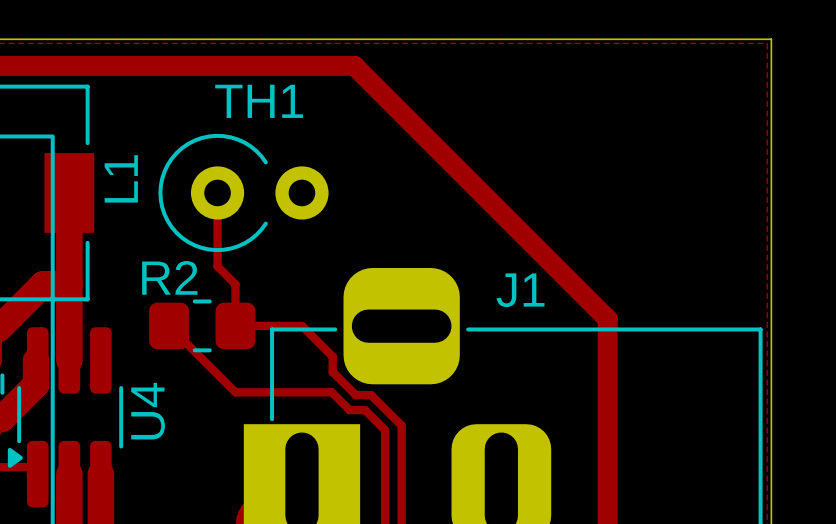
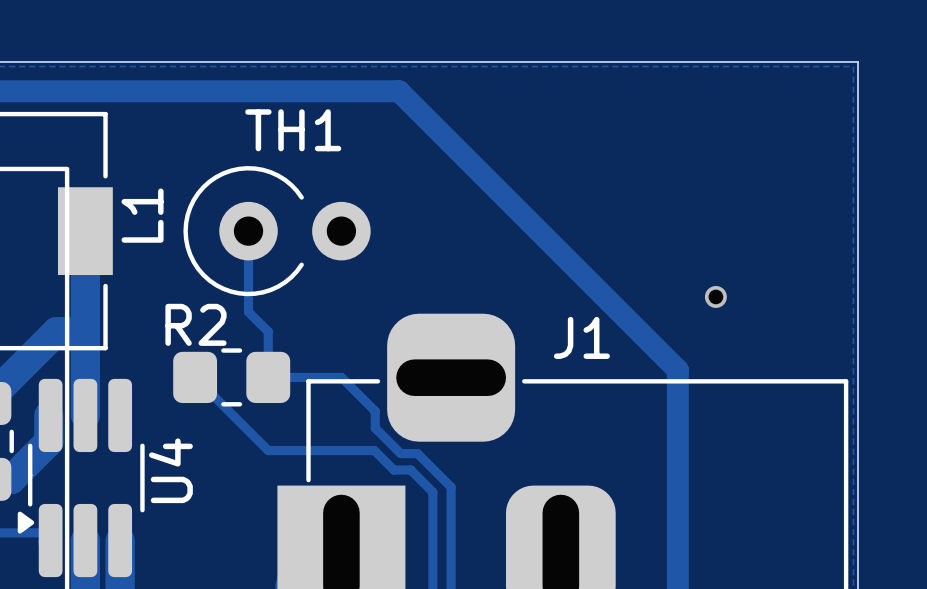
via: none -> (715, 296)

